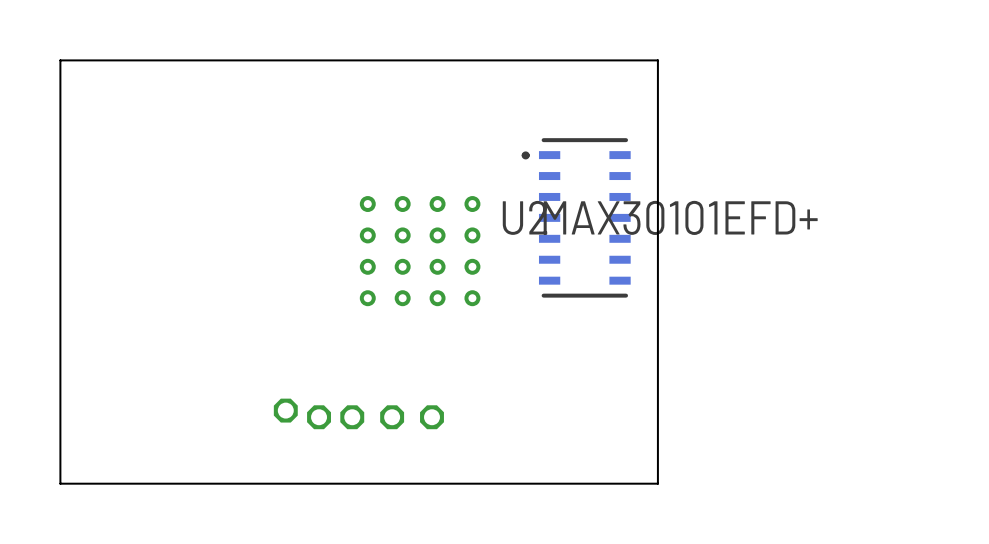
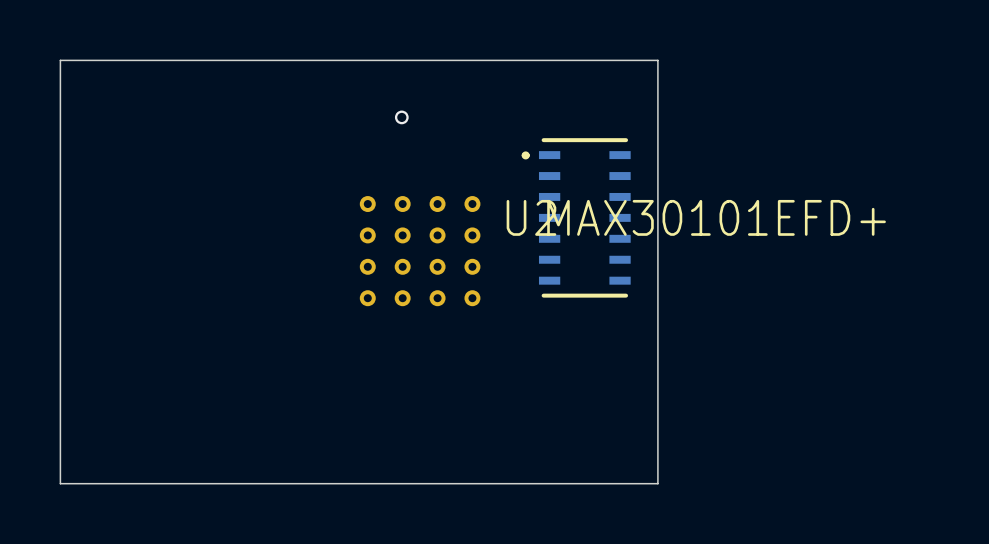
via: none -> (401, 117)
part: (285, 410) -> none
part: (319, 417) -> none
part: (352, 417) -> none
part: (392, 417) -> none
part: (431, 417) -> none

